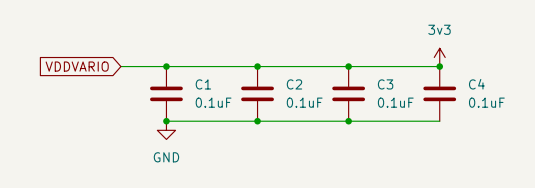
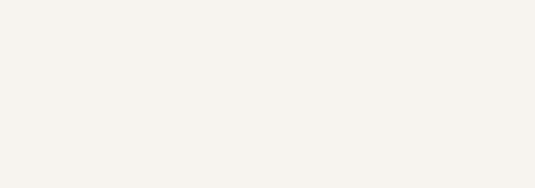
power symbol: 3v3 (439, 57) -> none
global label: VDDVARIO (77, 66) -> none
wire: (120, 66) (439, 66) -> none
junction: (166, 66) -> none
junction: (257, 66) -> none
junction: (348, 66) -> none
junction: (439, 66) -> none
C1: 0.1uF (166, 93) -> none
C2: 0.1uF (257, 93) -> none
C3: 0.1uF (348, 93) -> none
C4: 0.1uF (439, 93) -> none
wire: (166, 121) (439, 121) -> none
junction: (166, 121) -> none
junction: (257, 121) -> none
junction: (348, 121) -> none
power symbol: GND (166, 130) -> none

